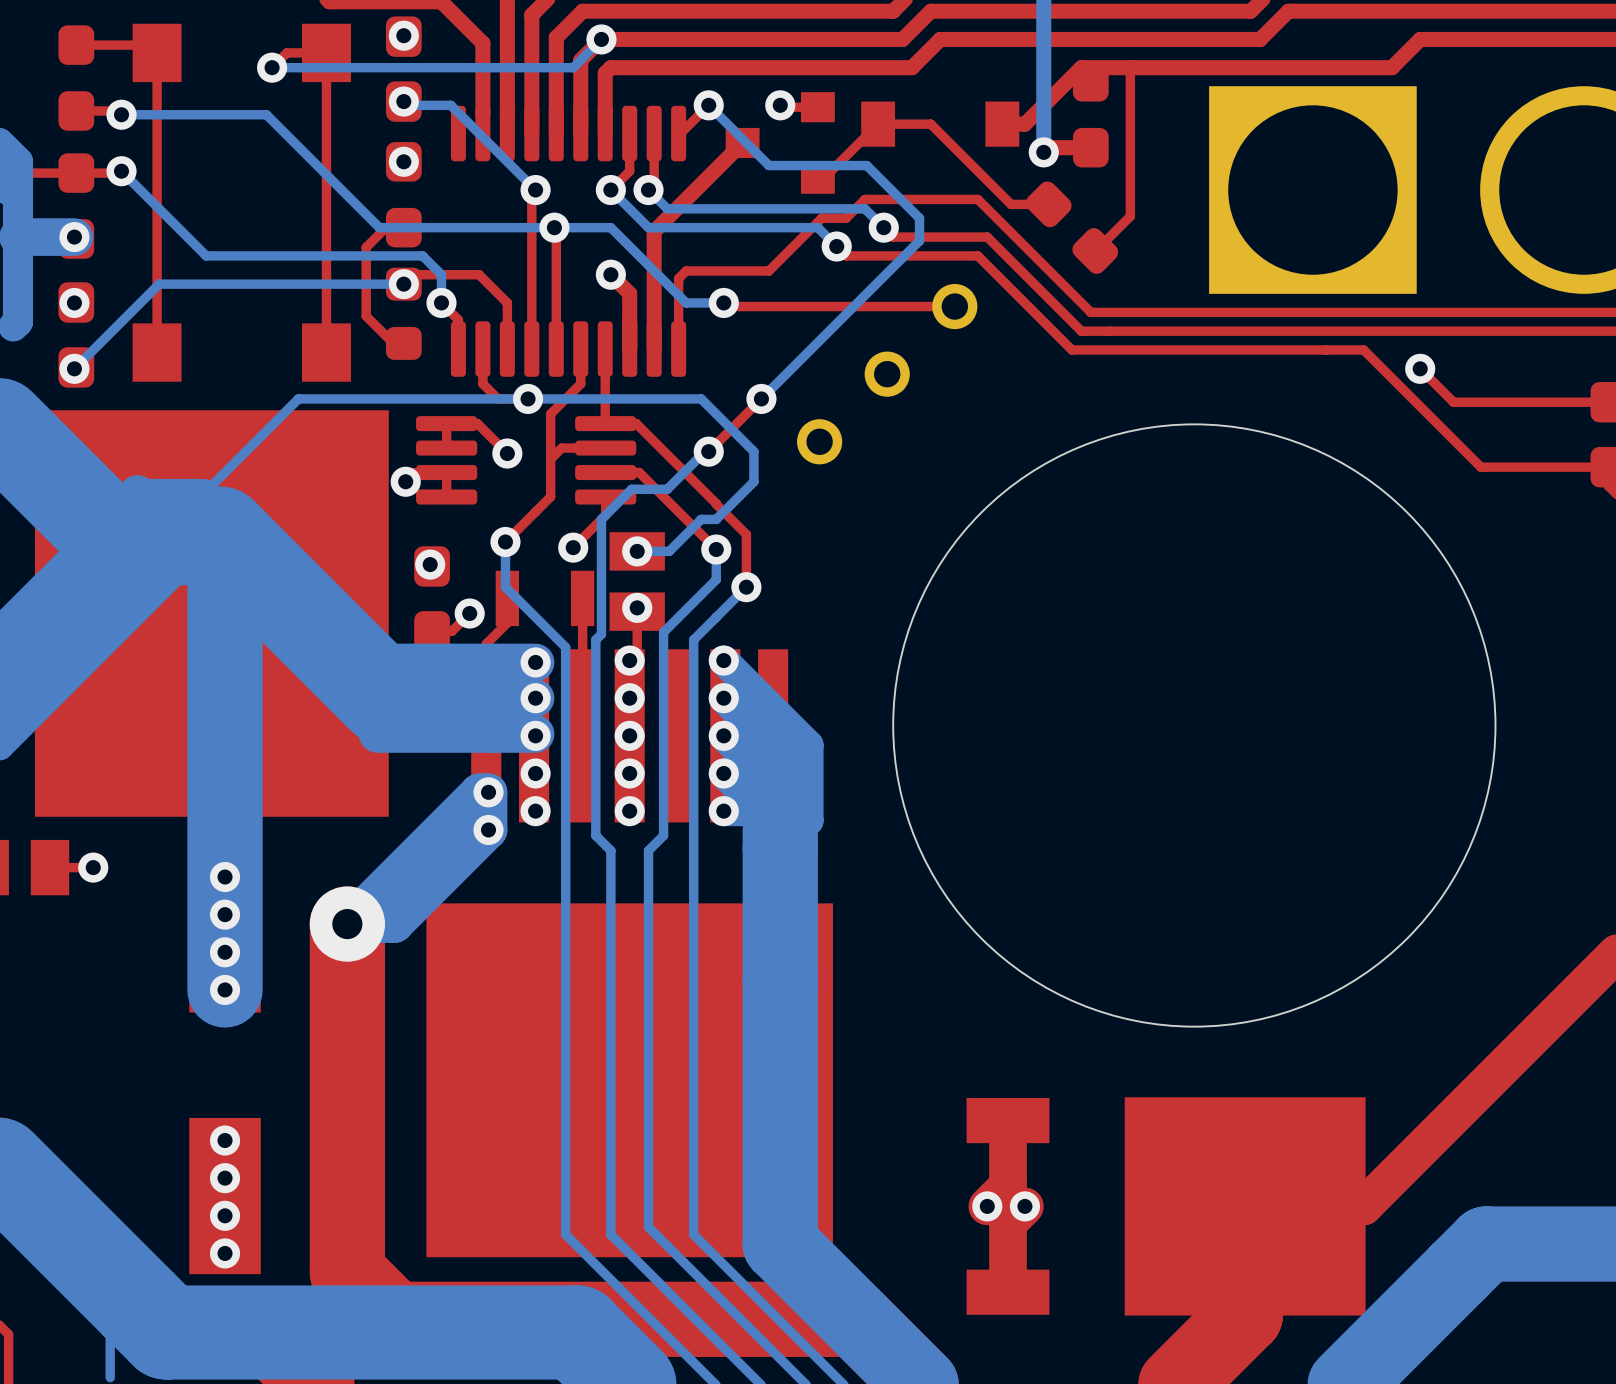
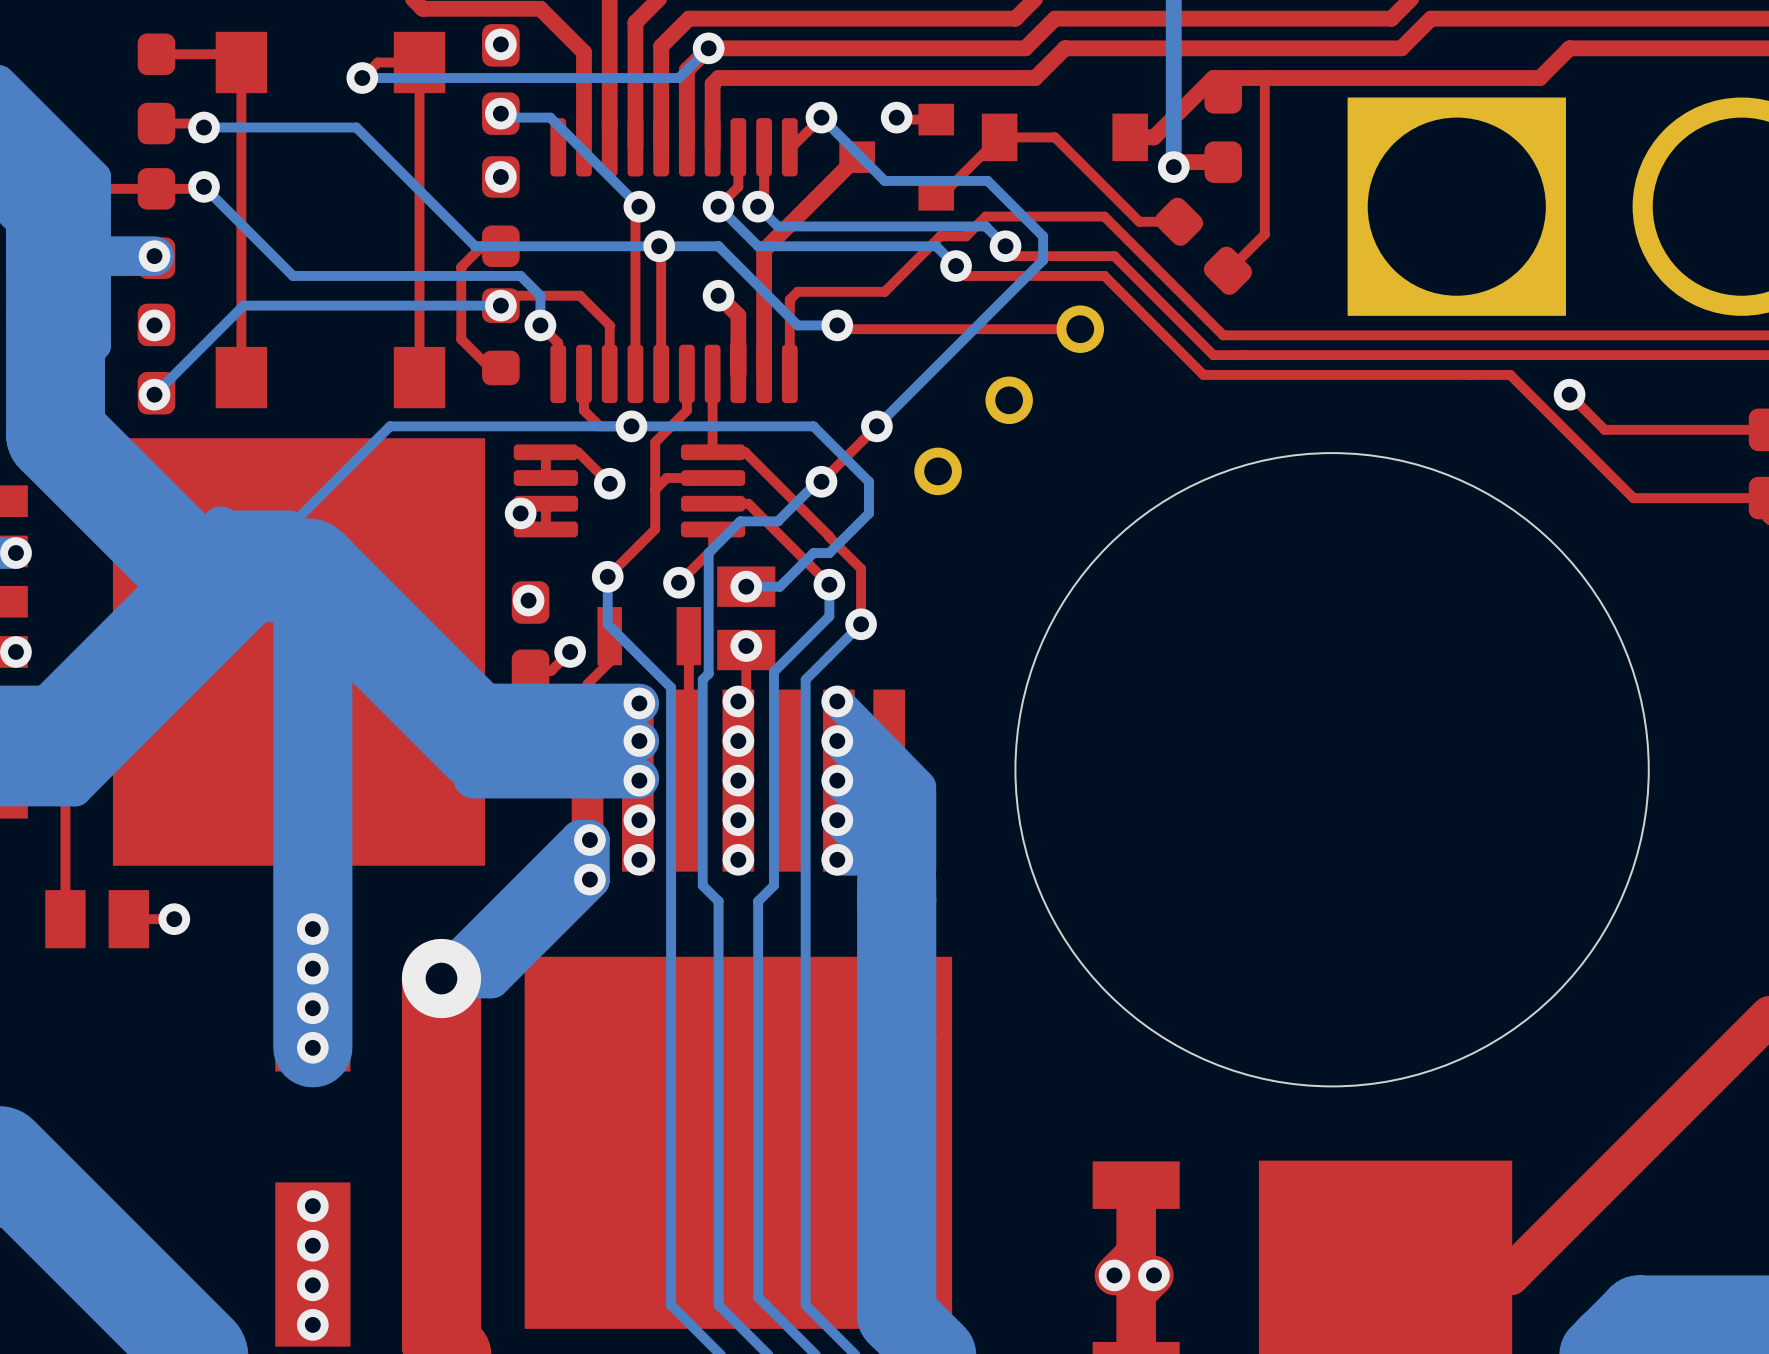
via position: (405, 481) -> (520, 513)
bottom track: (723, 660) (808, 745) (808, 820) (780, 848) -> (837, 701) (920, 786)
bottom track: none -> (920, 790) (920, 869)

